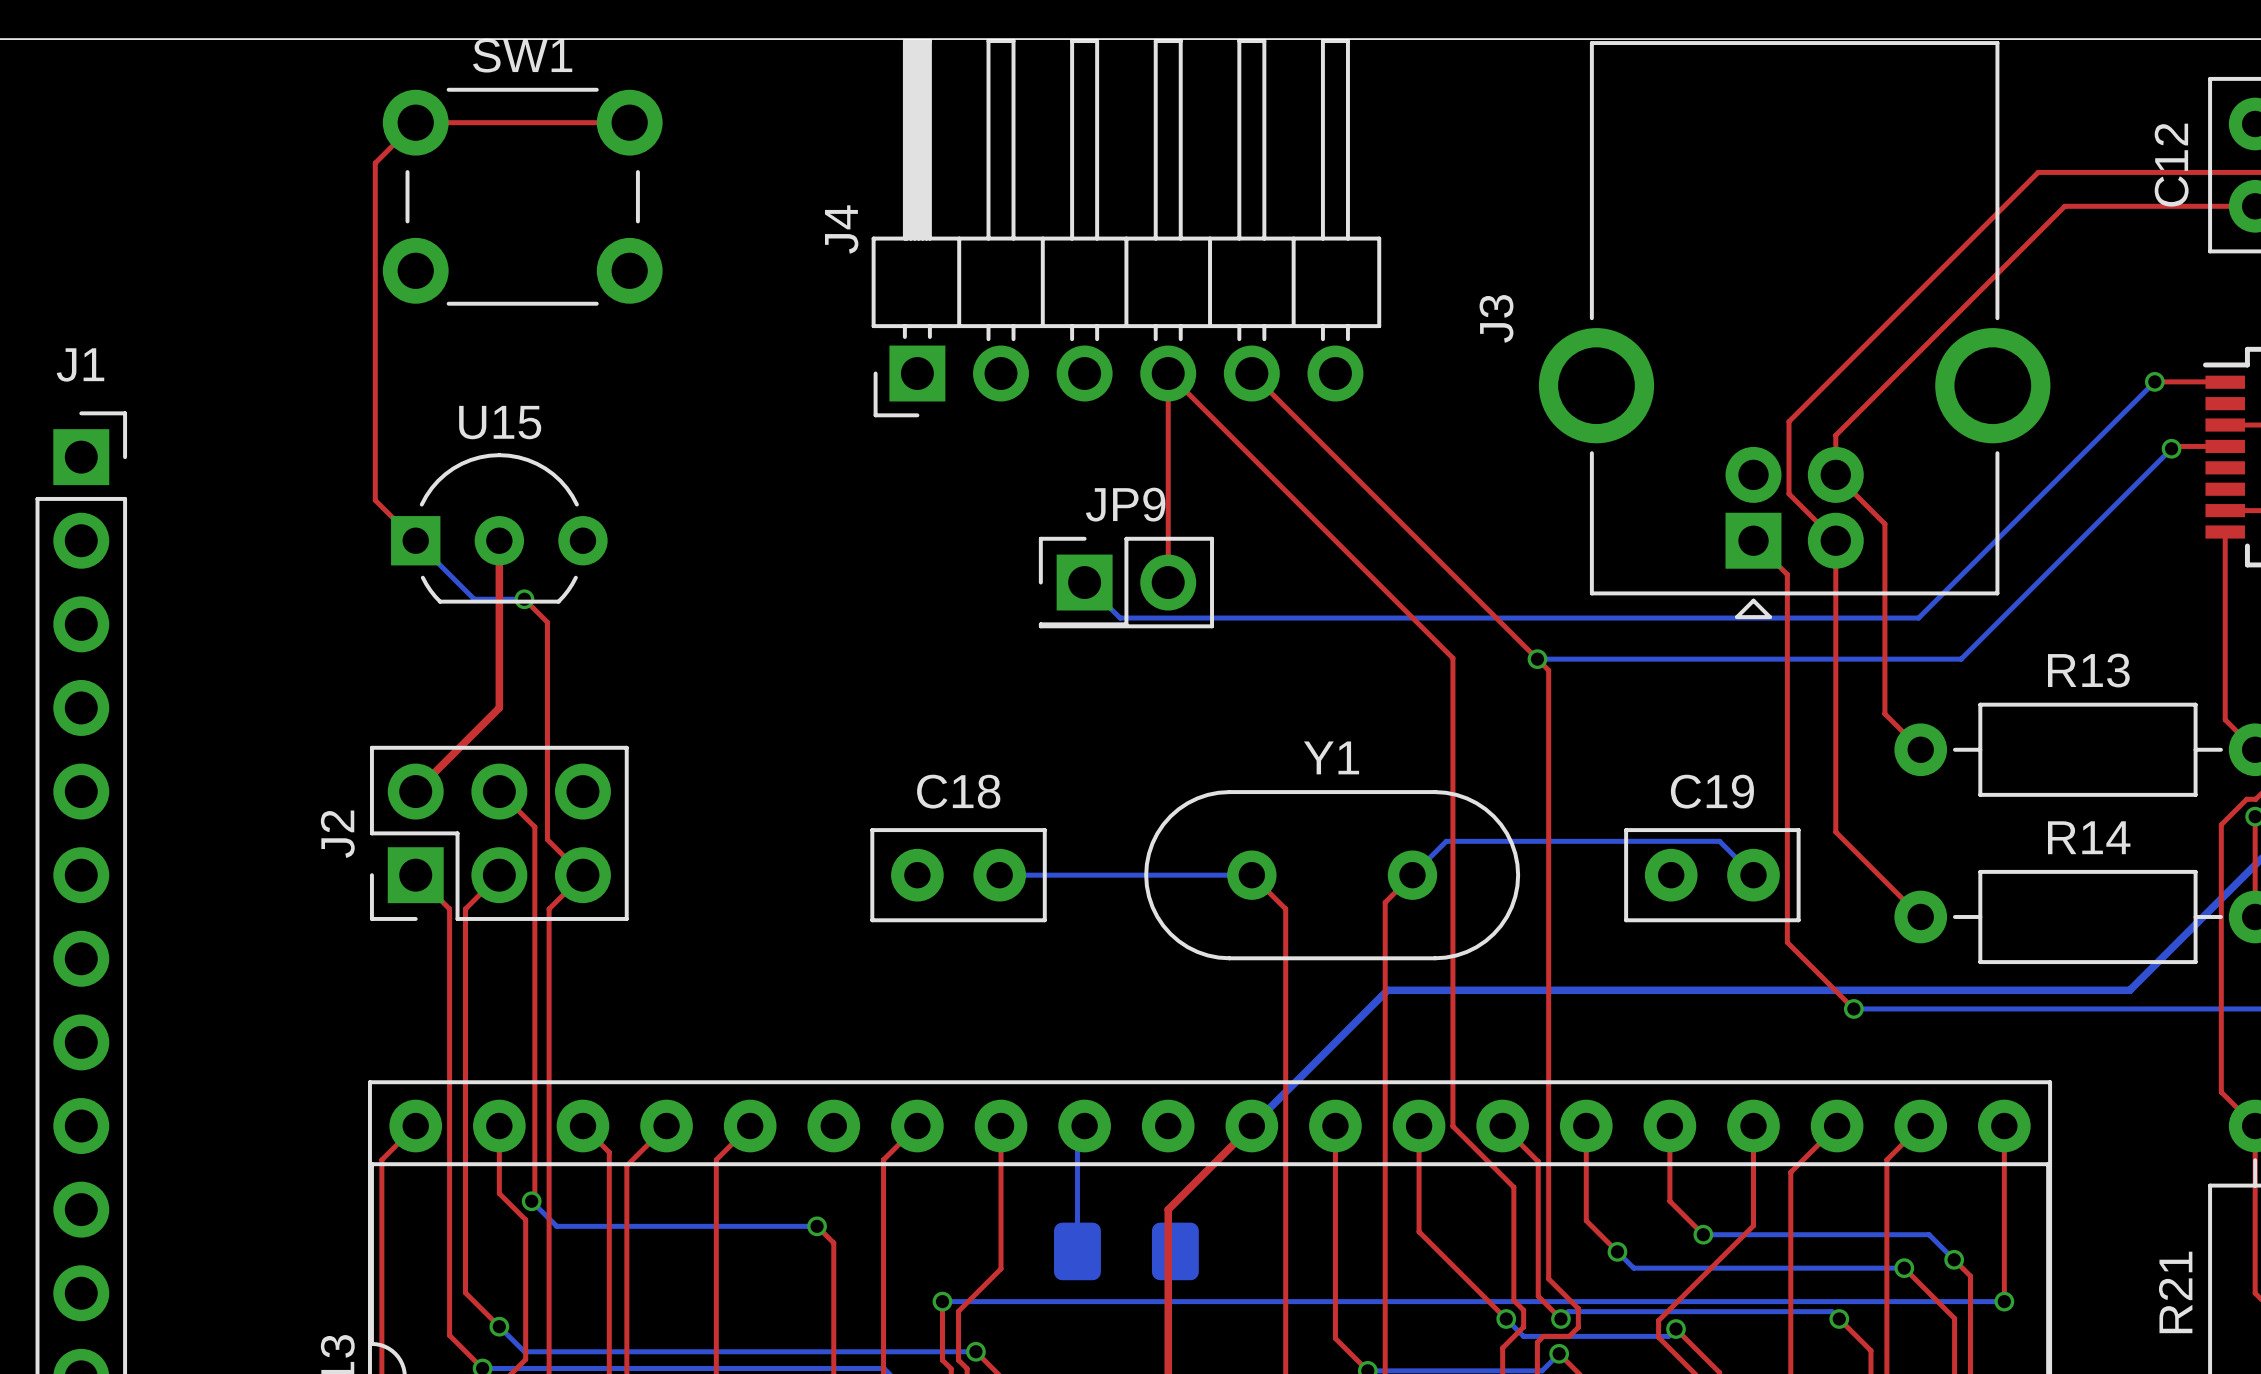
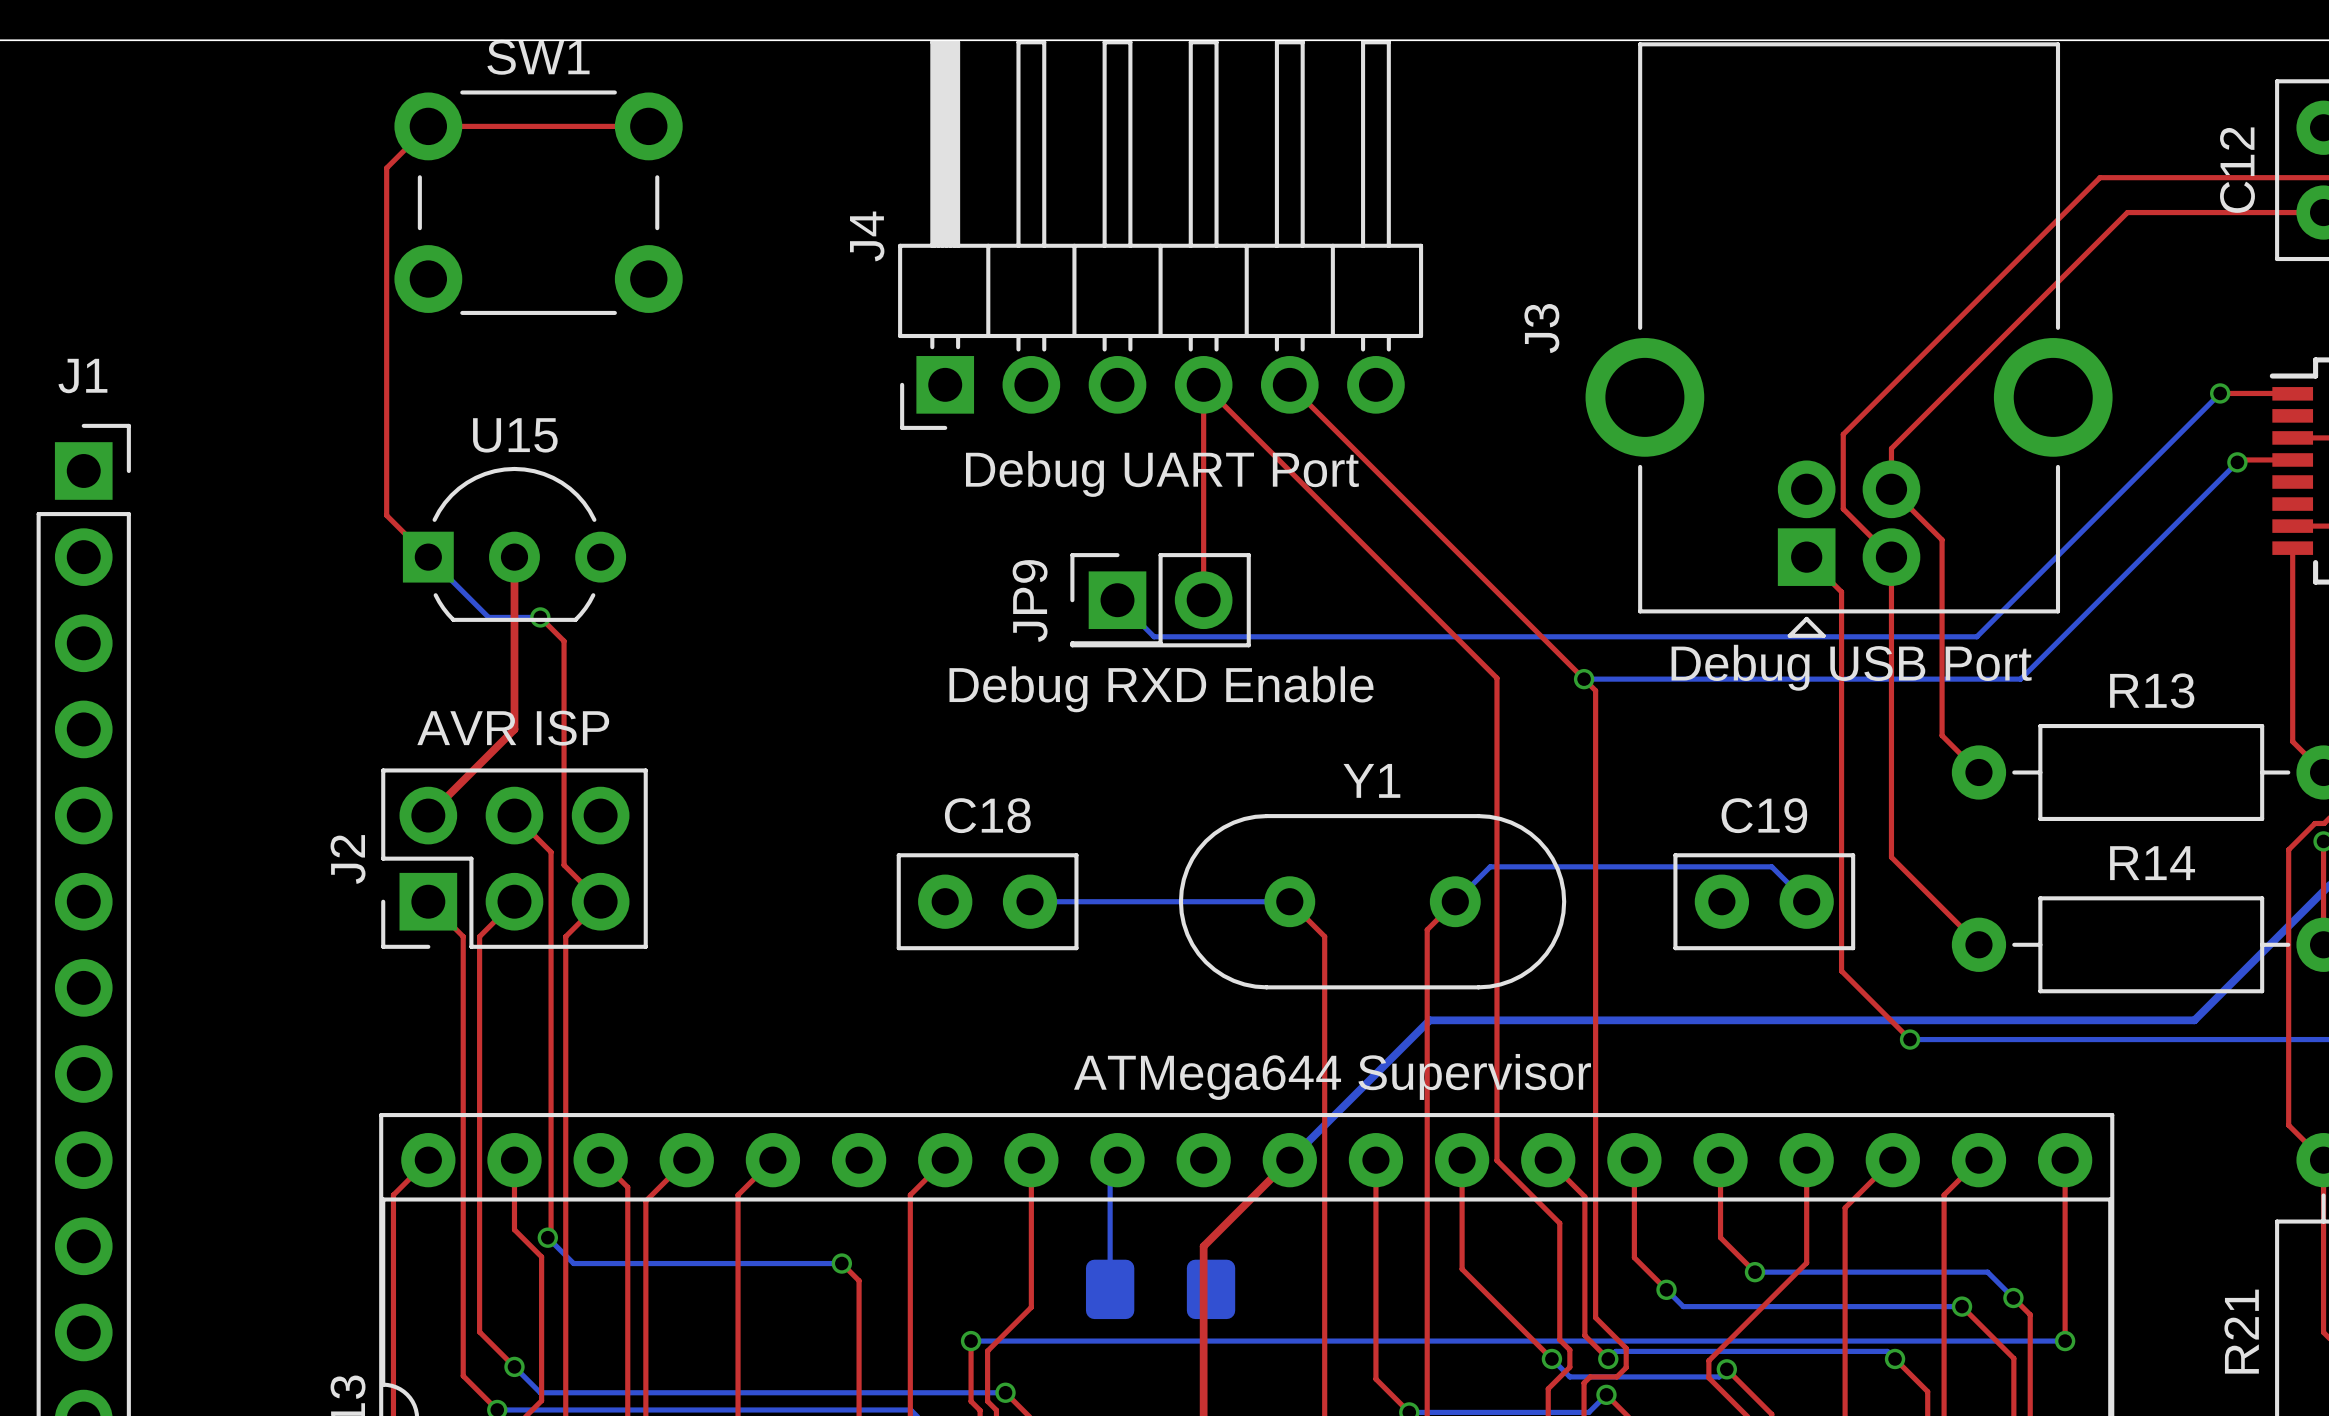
text: none -> Debug UART Port (1162, 473)
JP9 name rotation: 0° (1125, 504) -> 90° counterclockwise (1030, 600)
JP9 name position: JP9 (1125, 504) -> JP9 (1030, 600)
text: none -> Debug USB Port (1851, 667)
text: none -> Debug RXD Enable (1161, 689)
text: none -> AVR ISP (513, 728)
text: none -> ATMega644 Supervisor (1332, 1076)

